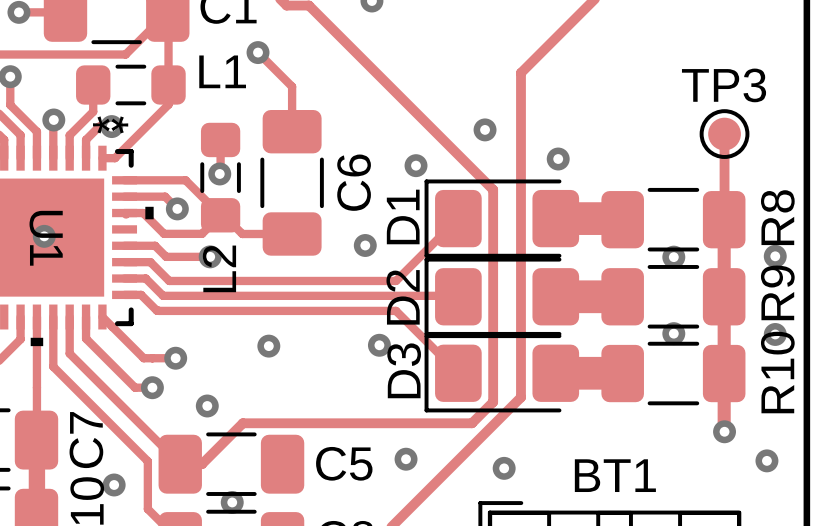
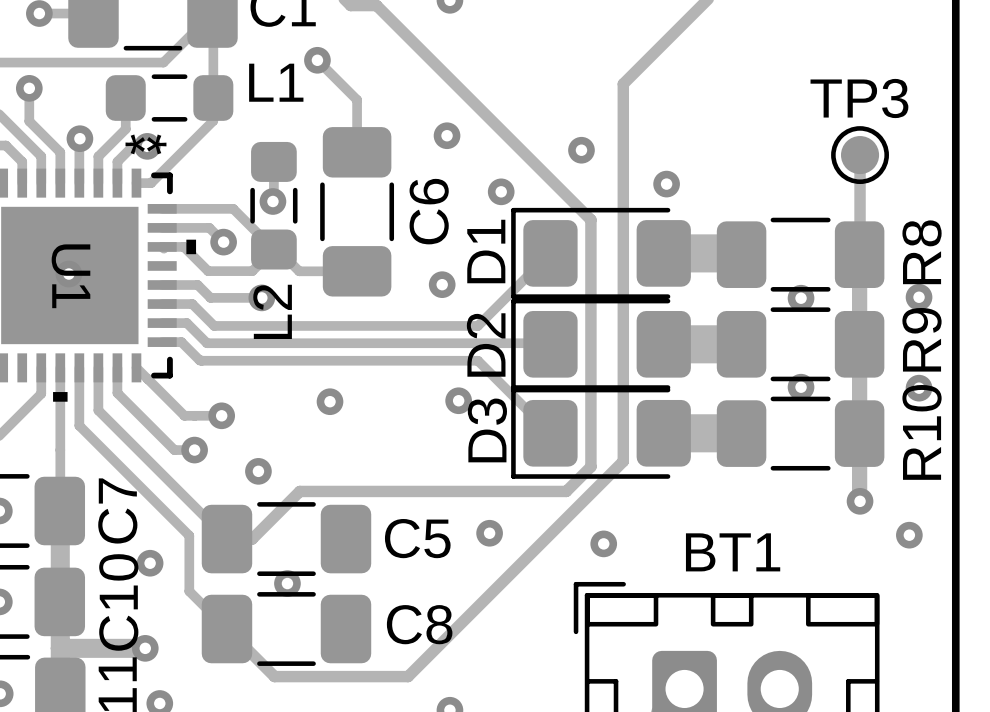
via: none -> (447, 135)

